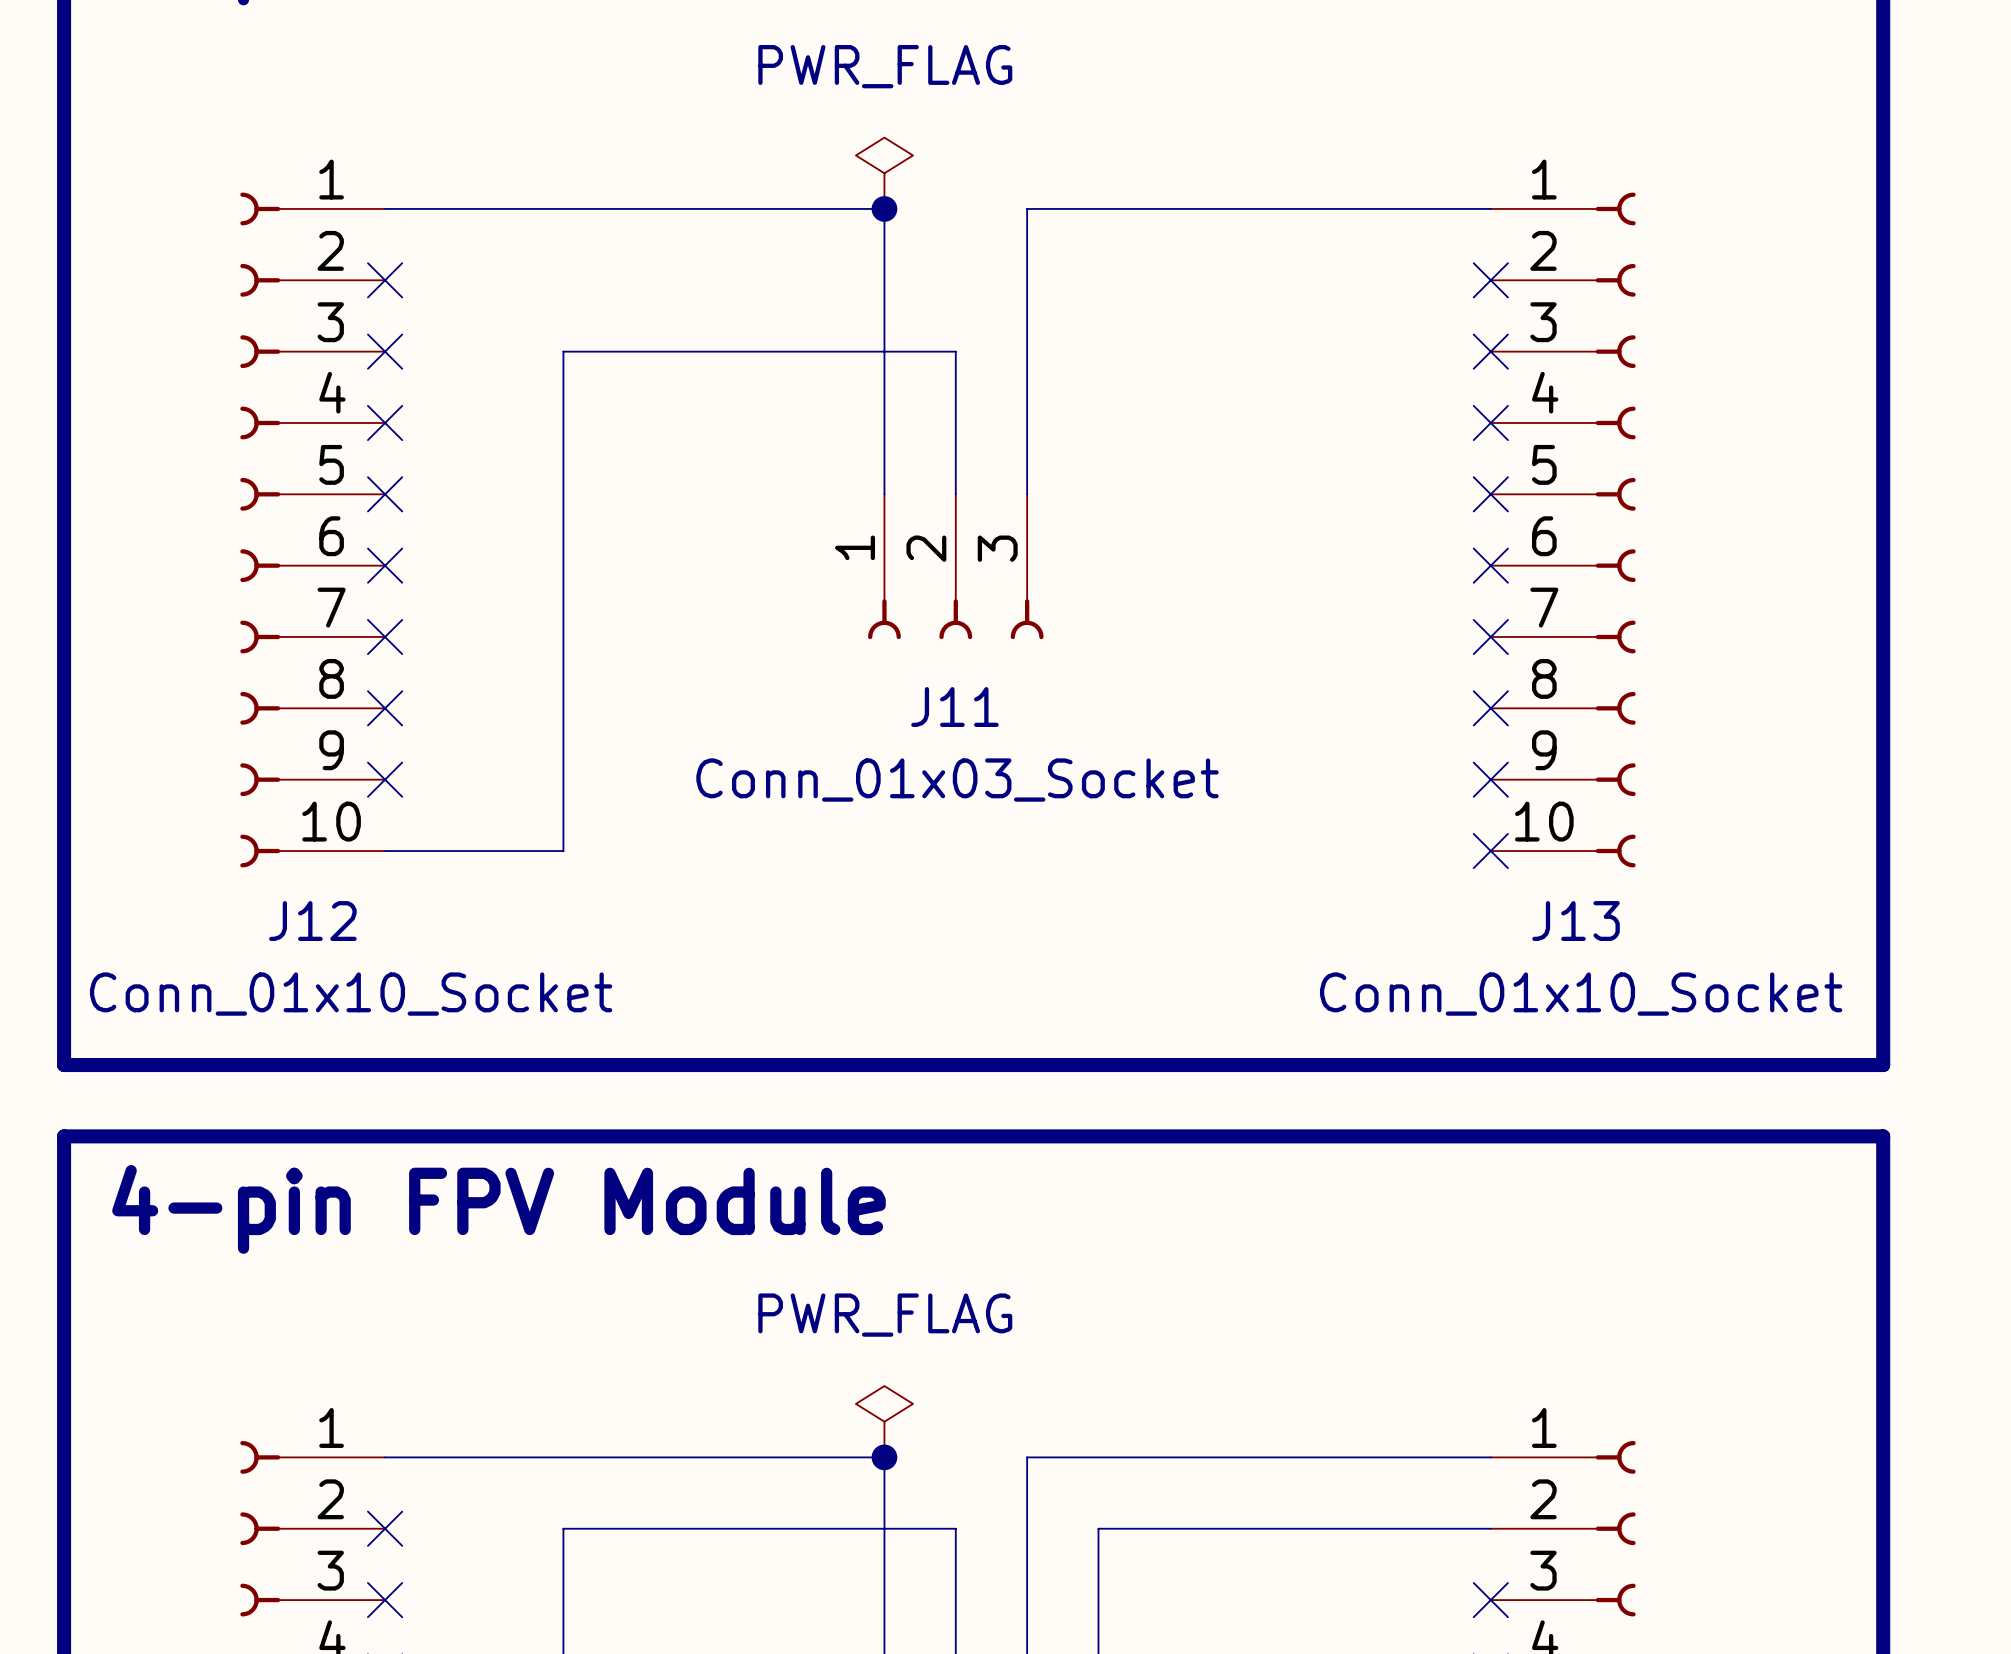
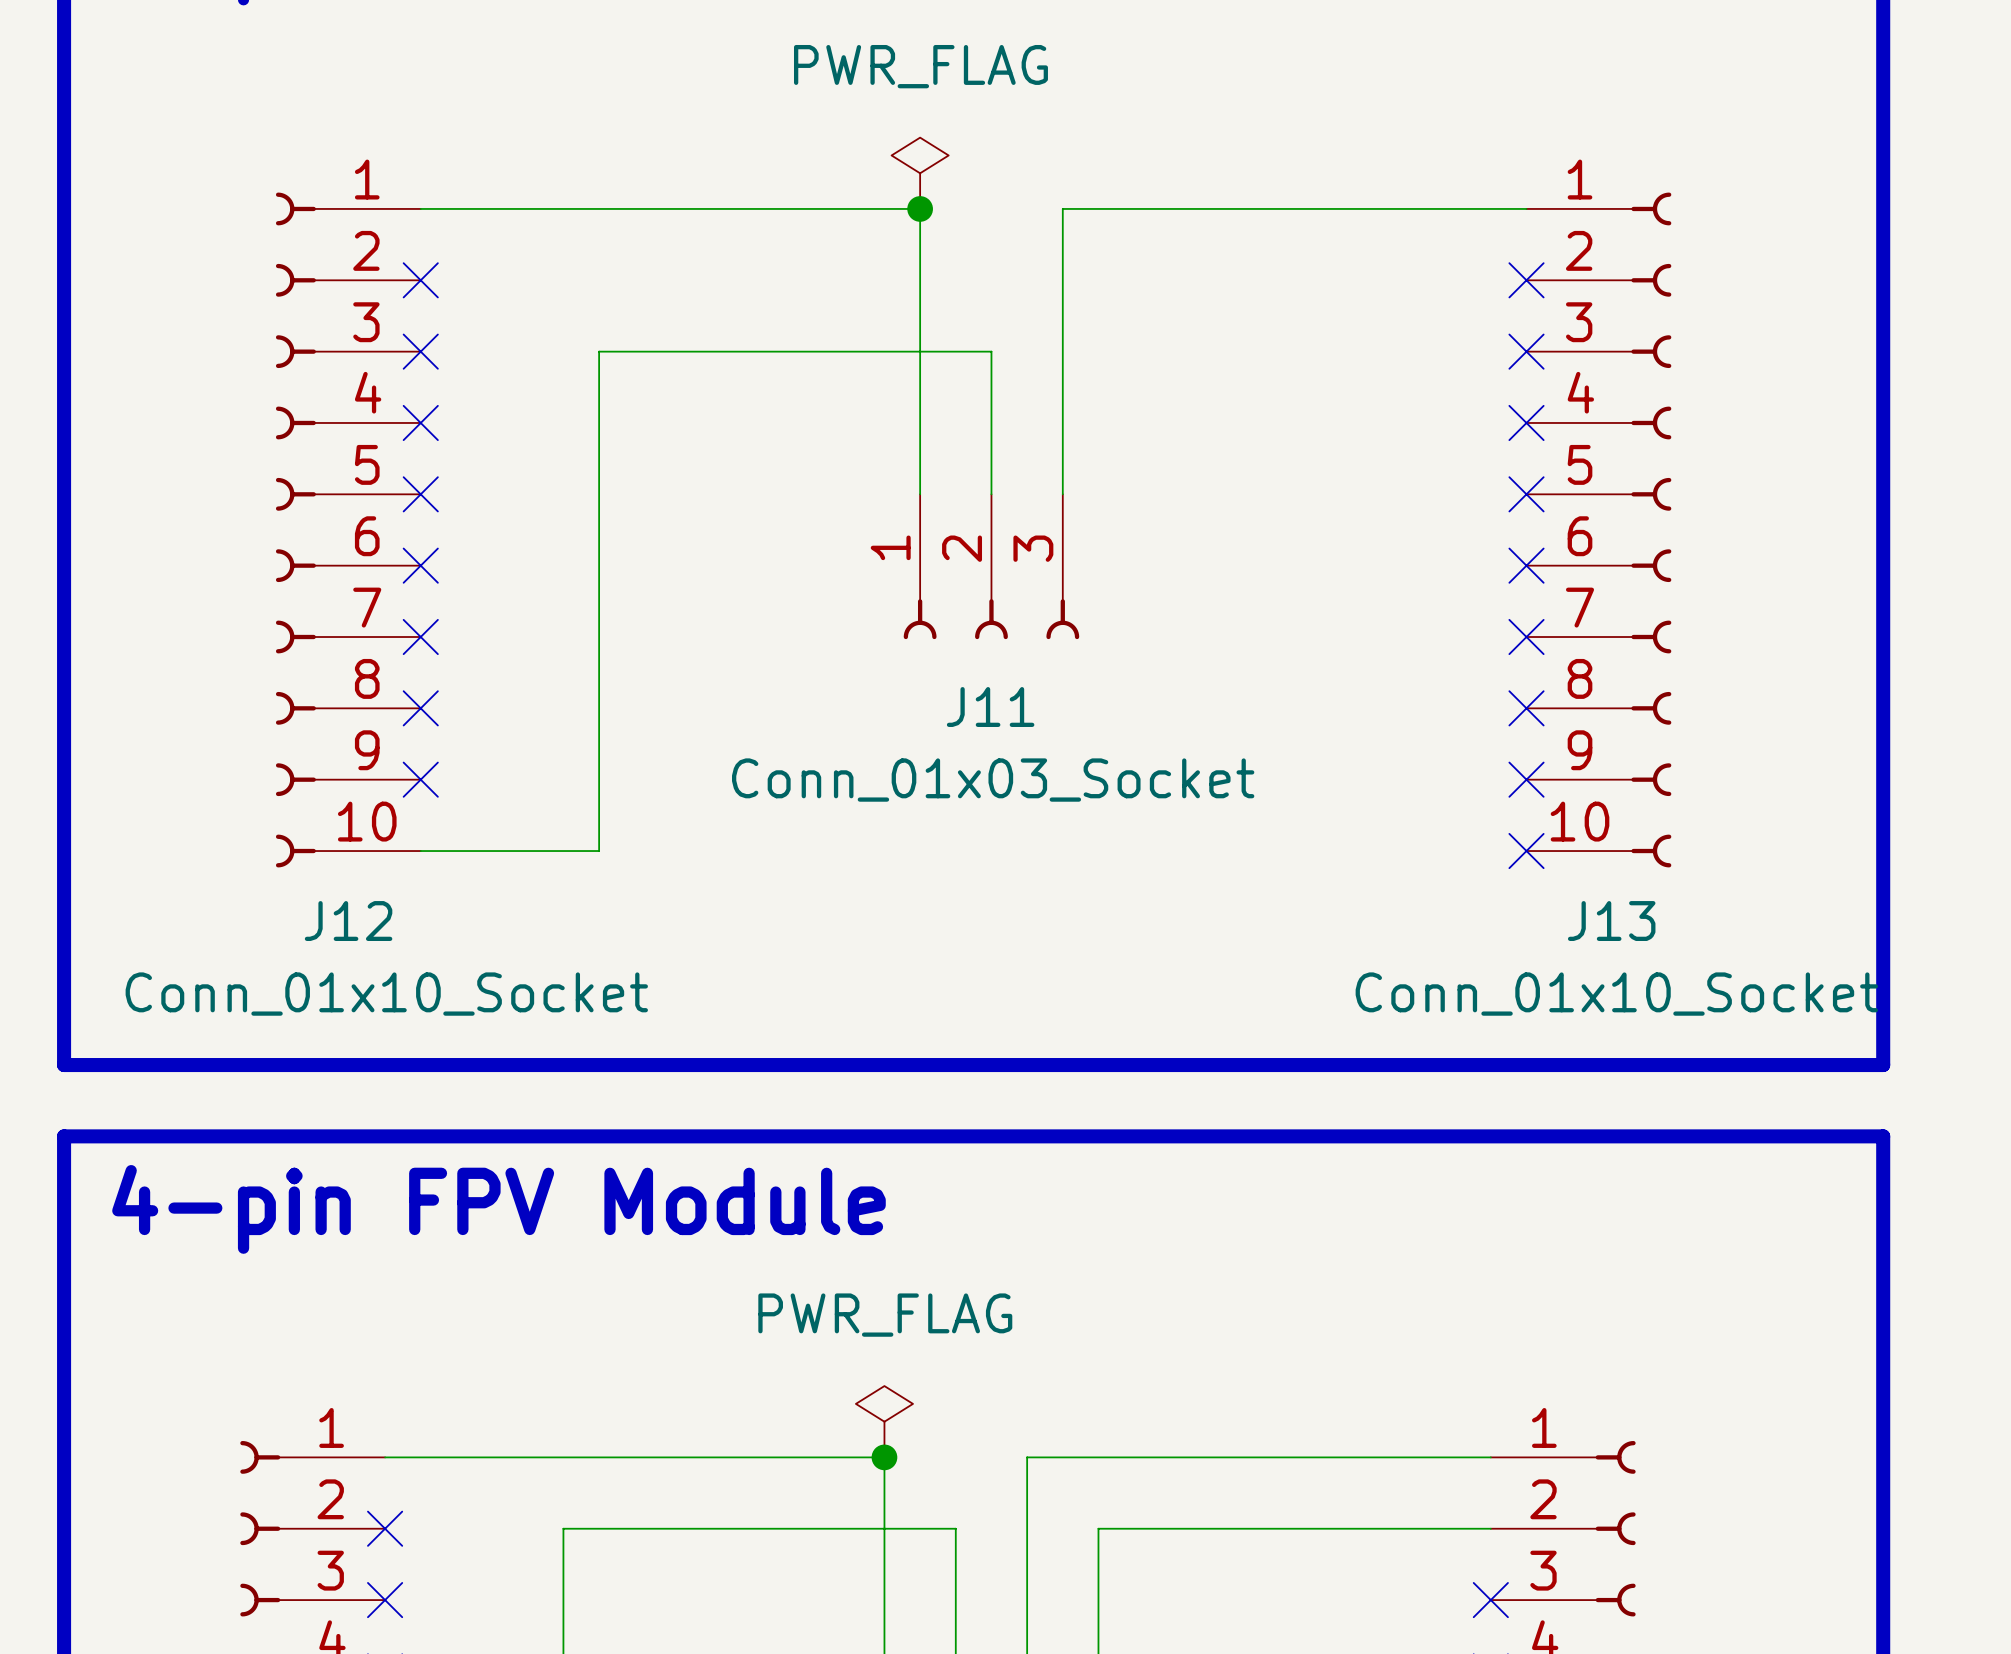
power symbol position: PWR_FLAG (884, 173) -> PWR_FLAG (920, 173)
wire: (884, 208) (884, 494) -> (884, 208) (920, 208) (920, 494)
junction position: (884, 208) -> (920, 208)
wire: (1062, 208) (1027, 208) (1027, 494) -> (1062, 208) (1062, 494)
no-connect mark position: (385, 280) -> (420, 280)
no-connect mark position: (1490, 280) -> (1526, 280)
no-connect mark position: (385, 351) -> (420, 351)
wire: (599, 351) (563, 351) (563, 851) -> (599, 351) (599, 851) (563, 851)
wire: (955, 351) (955, 494) -> (955, 351) (991, 351) (991, 494)
no-connect mark position: (1490, 351) -> (1526, 351)
no-connect mark position: (385, 422) -> (420, 422)
no-connect mark position: (1490, 422) -> (1526, 422)
no-connect mark position: (385, 494) -> (420, 494)
no-connect mark position: (1490, 494) -> (1526, 494)
J12 position: (312, 529) -> (348, 529)
J13 position: (1563, 529) -> (1598, 529)
no-connect mark position: (385, 565) -> (420, 565)
no-connect mark position: (1490, 565) -> (1526, 565)
J11 position: (955, 566) -> (991, 566)
no-connect mark position: (385, 637) -> (420, 637)
no-connect mark position: (1490, 637) -> (1526, 637)
no-connect mark position: (385, 708) -> (420, 708)
no-connect mark position: (1490, 708) -> (1526, 708)
no-connect mark position: (385, 779) -> (420, 779)
no-connect mark position: (1490, 779) -> (1526, 779)
no-connect mark position: (1490, 851) -> (1526, 851)

